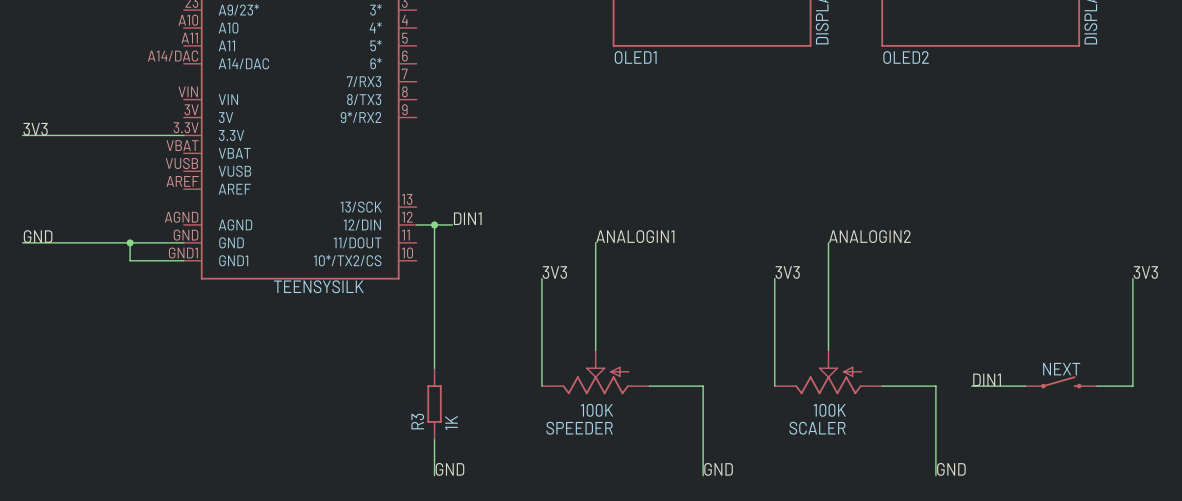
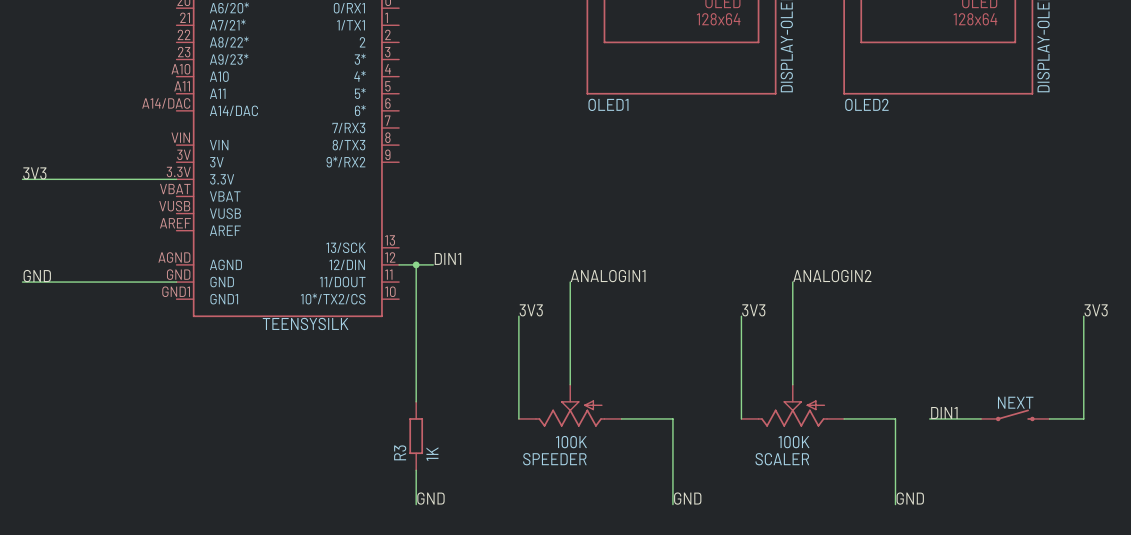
wire: (130, 242) (130, 260) (183, 260) -> none
junction: (130, 242) -> none

